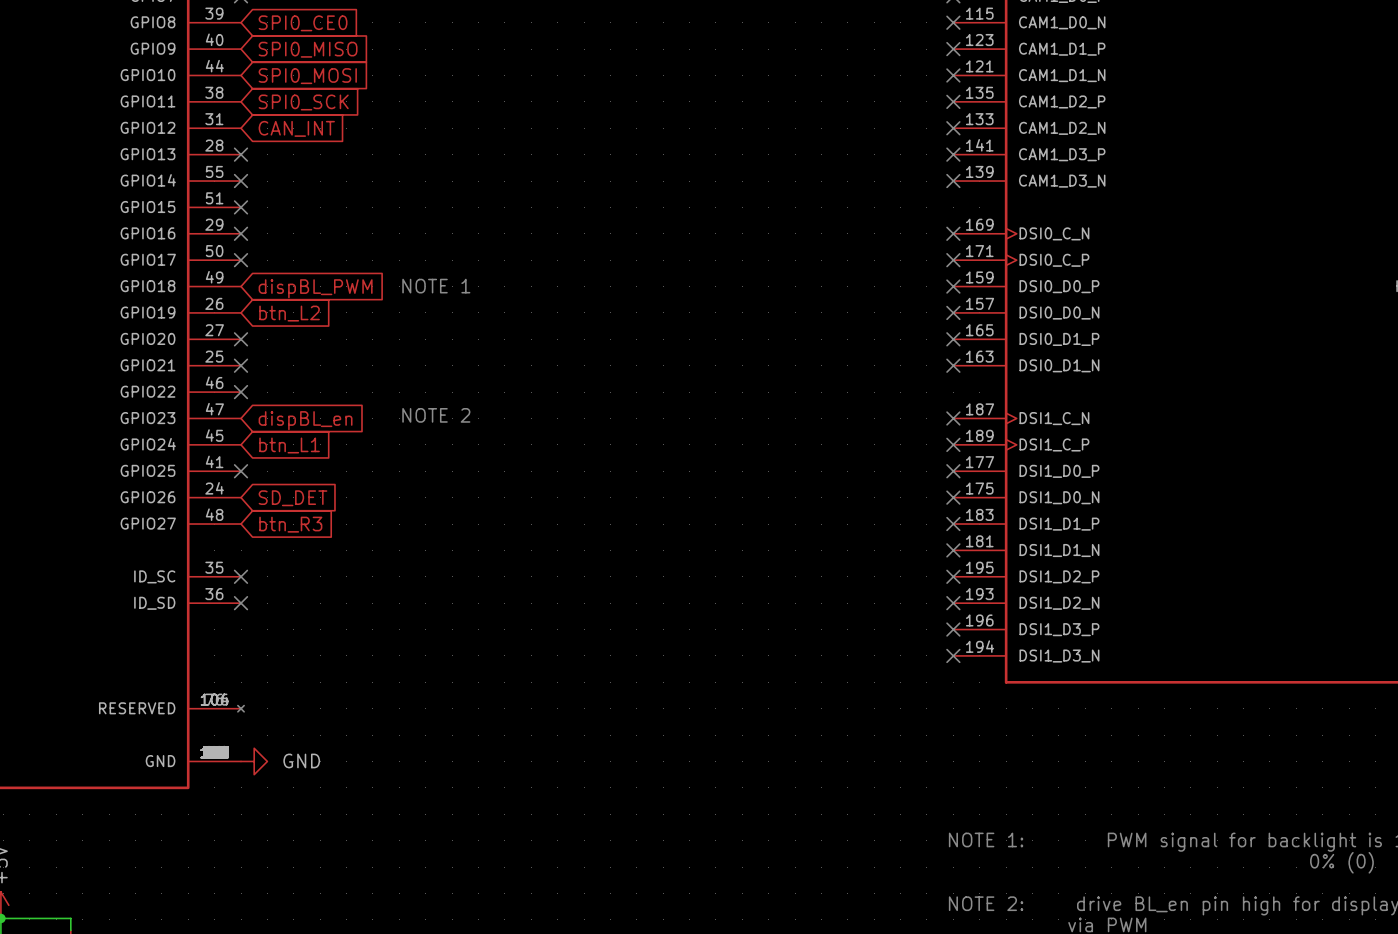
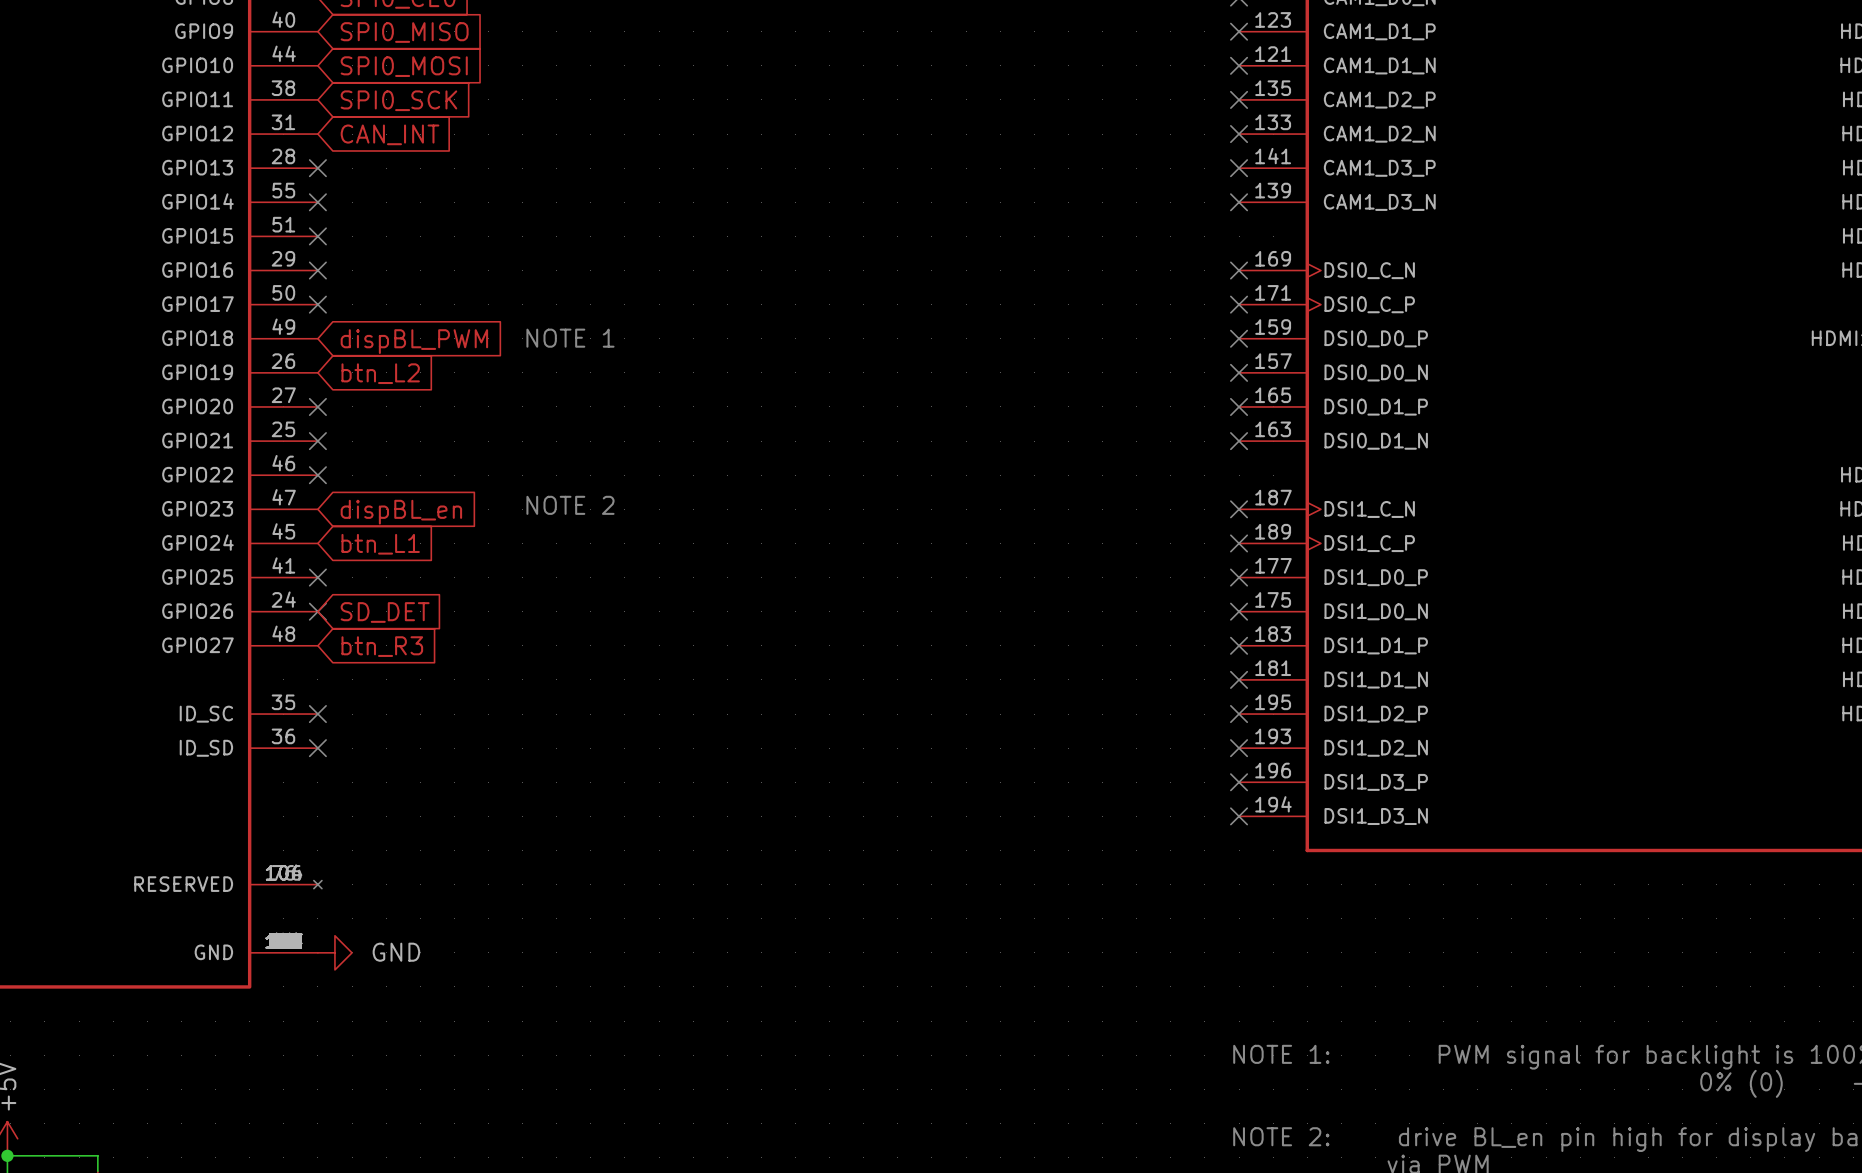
no-connect mark: none -> (317, 611)

